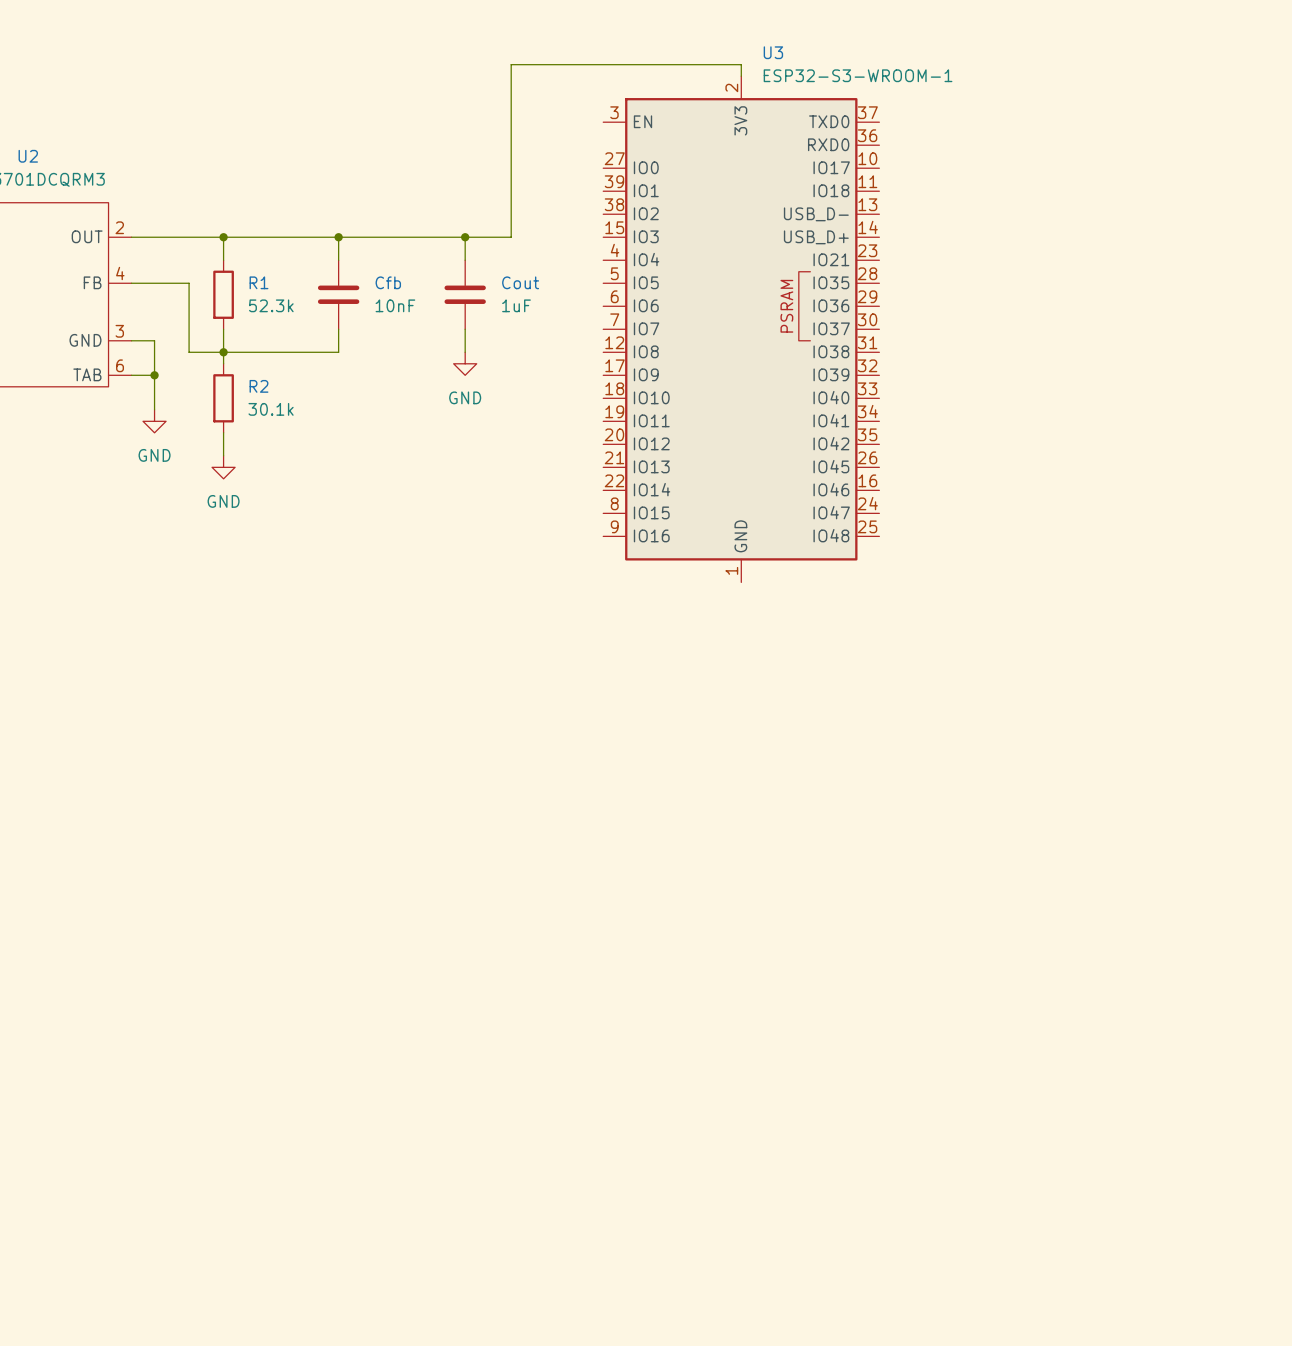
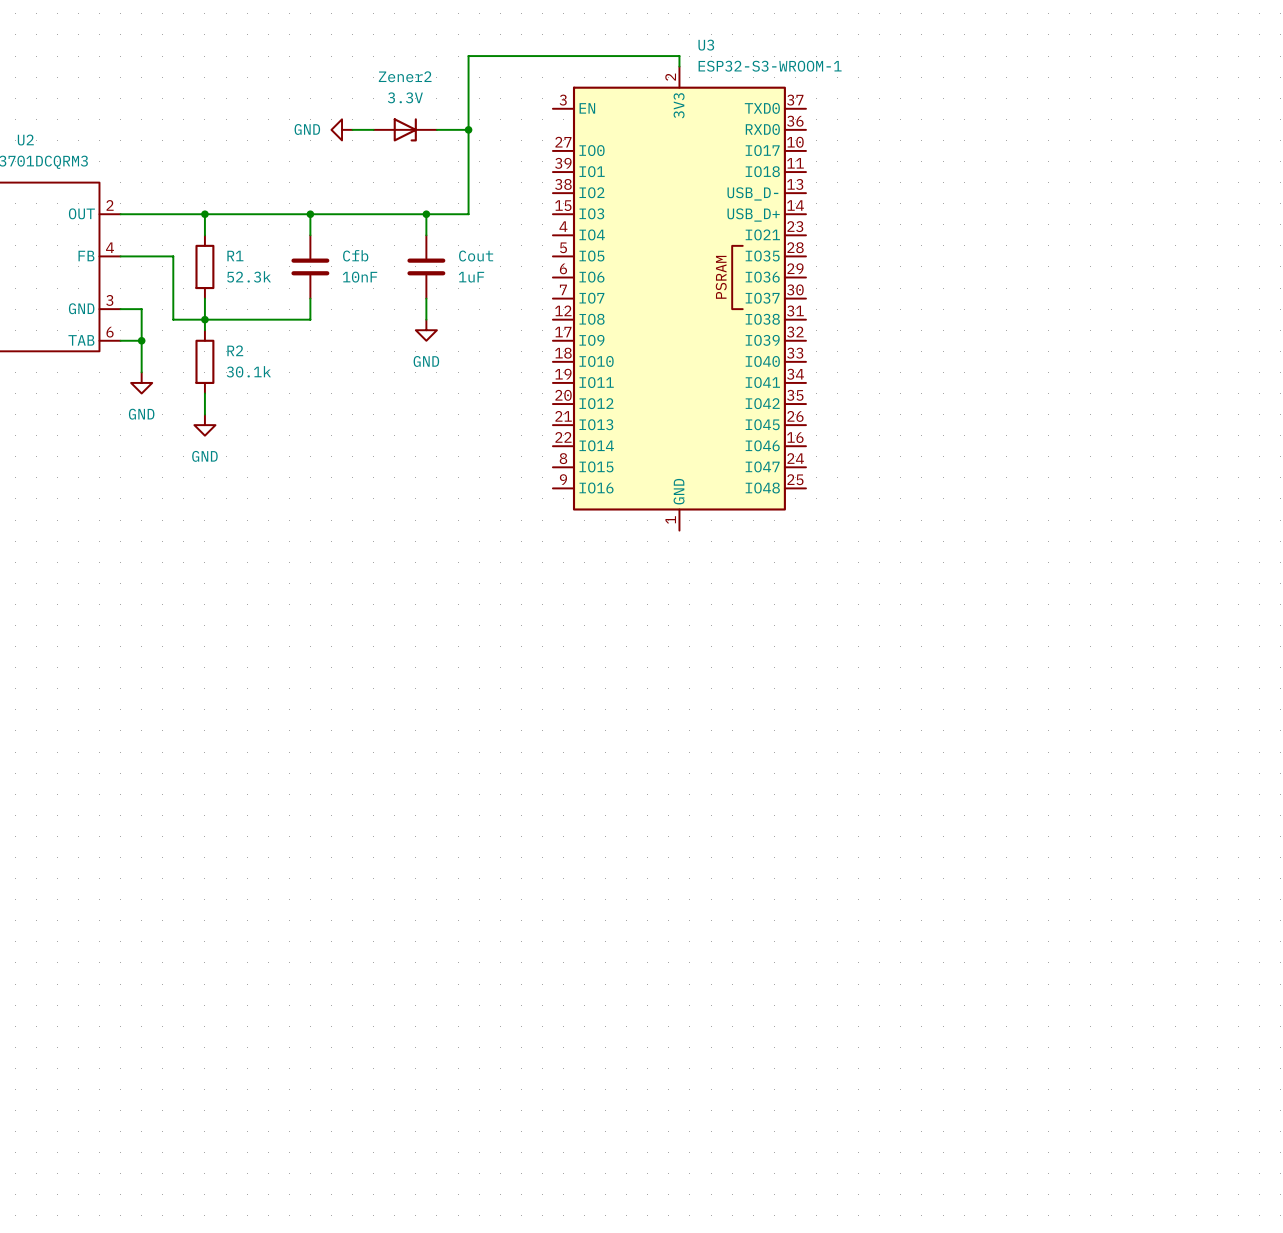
power symbol: none -> GND (342, 129)
wire: none -> (352, 129) (373, 129)
Zener2: none -> 3.3V (405, 129)
wire: none -> (436, 129) (468, 129)
junction: none -> (468, 129)

